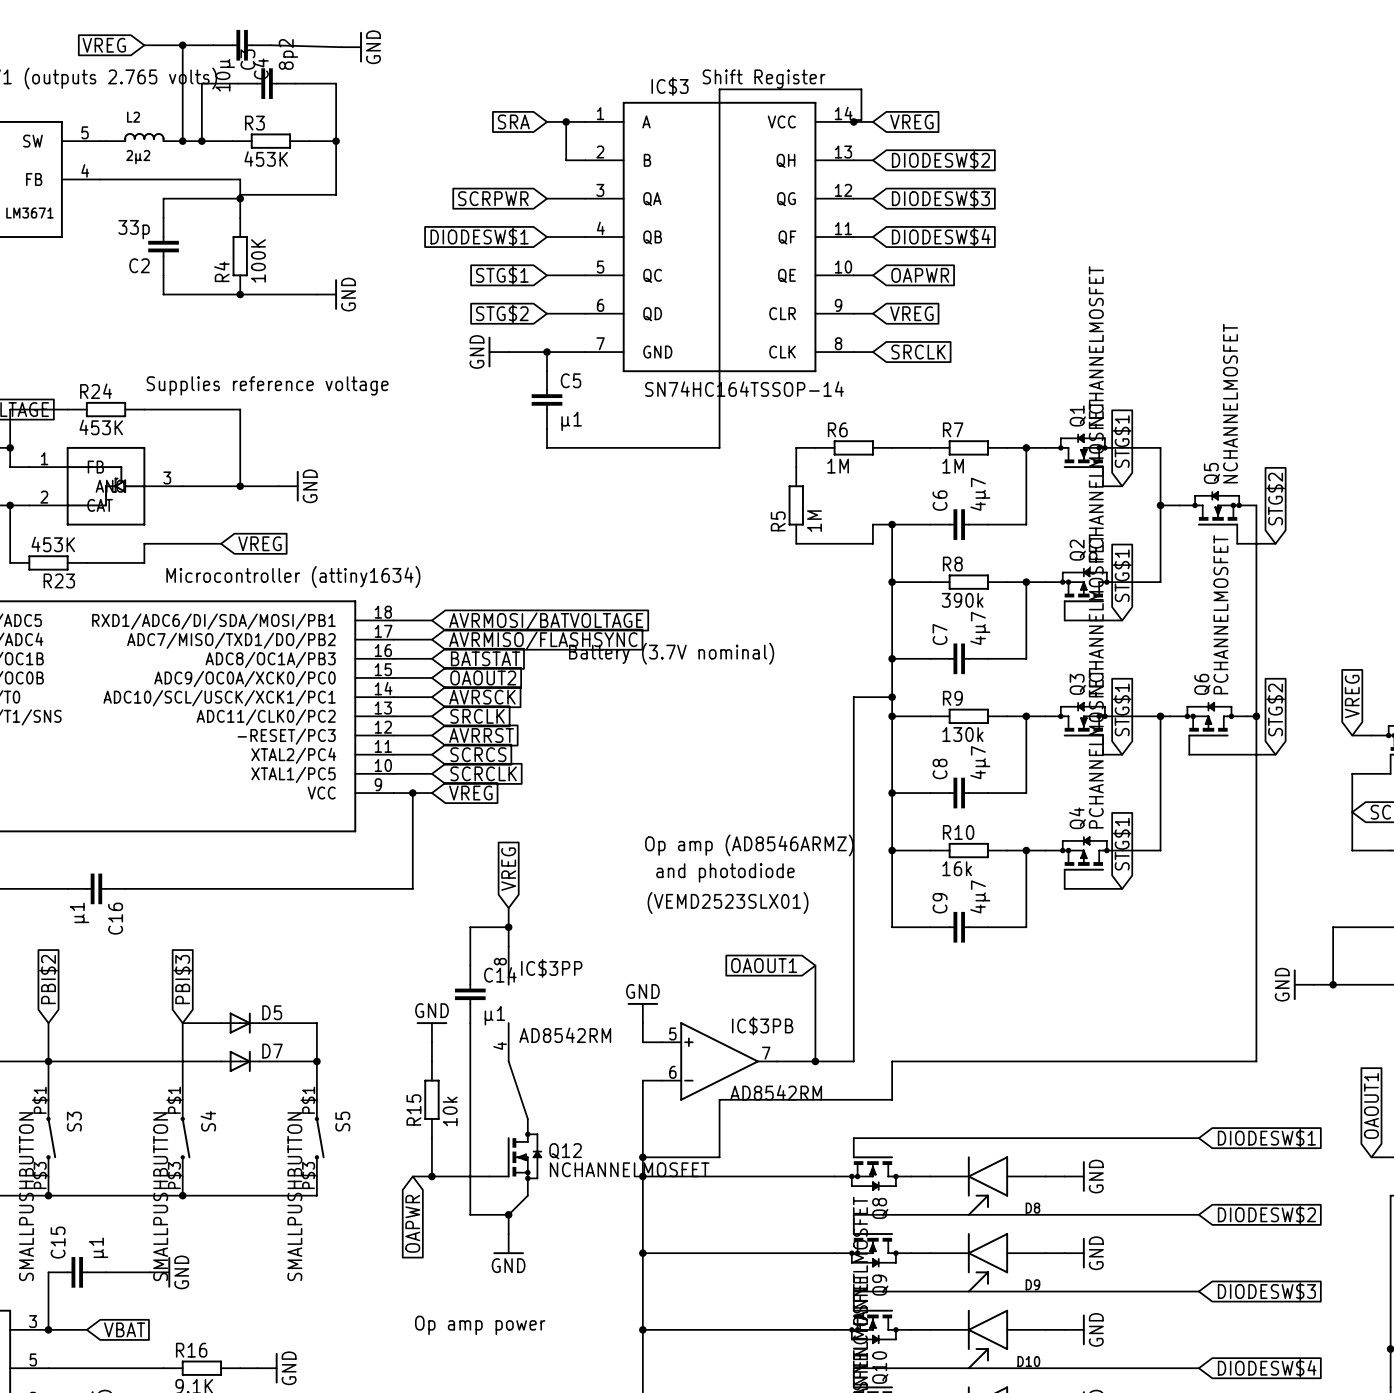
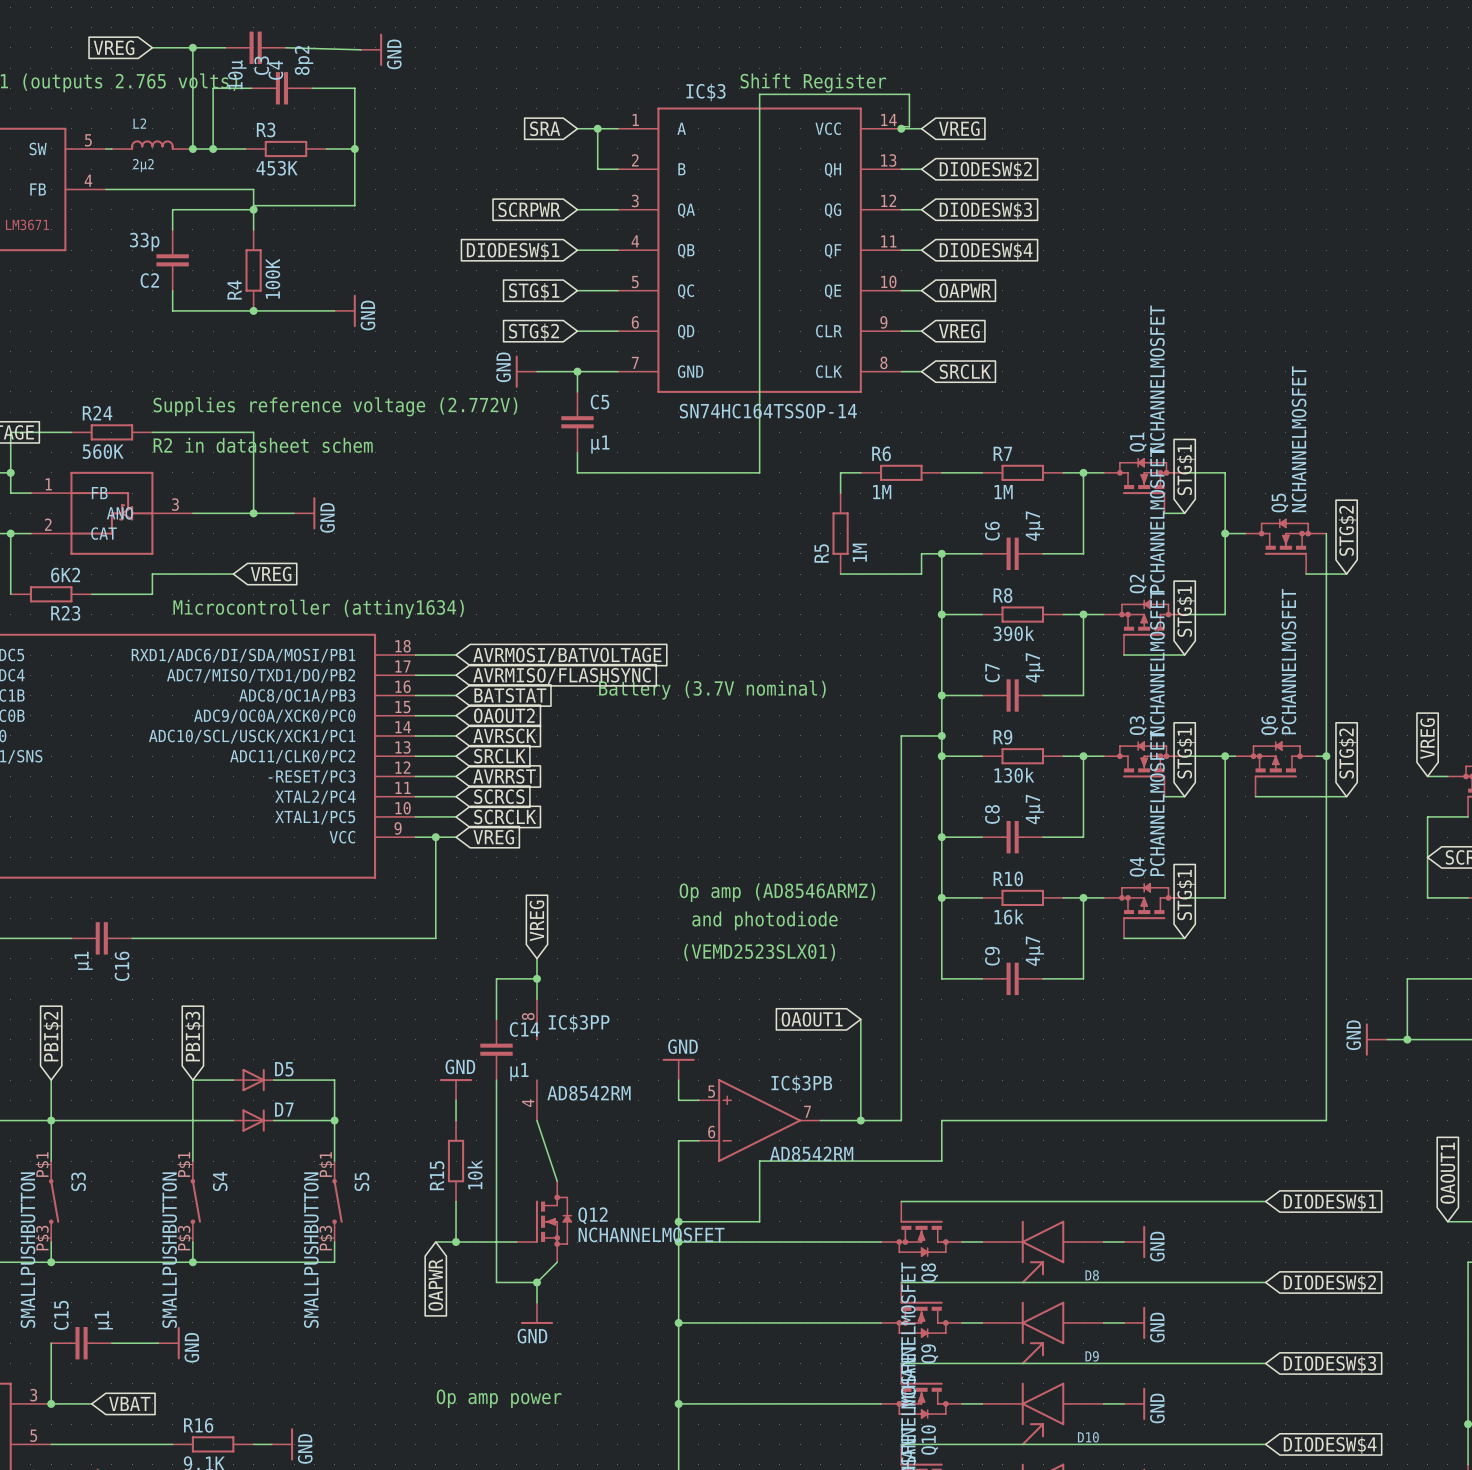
text: Supplies reference voltage (267, 385) -> Supplies reference voltage (2.772V) (335, 406)
text: none -> R2 in datasheet schem (263, 445)
R24 value: 453K (101, 427) -> 560K (103, 451)
R23 value: 453K (53, 544) -> 6K2 (65, 575)

